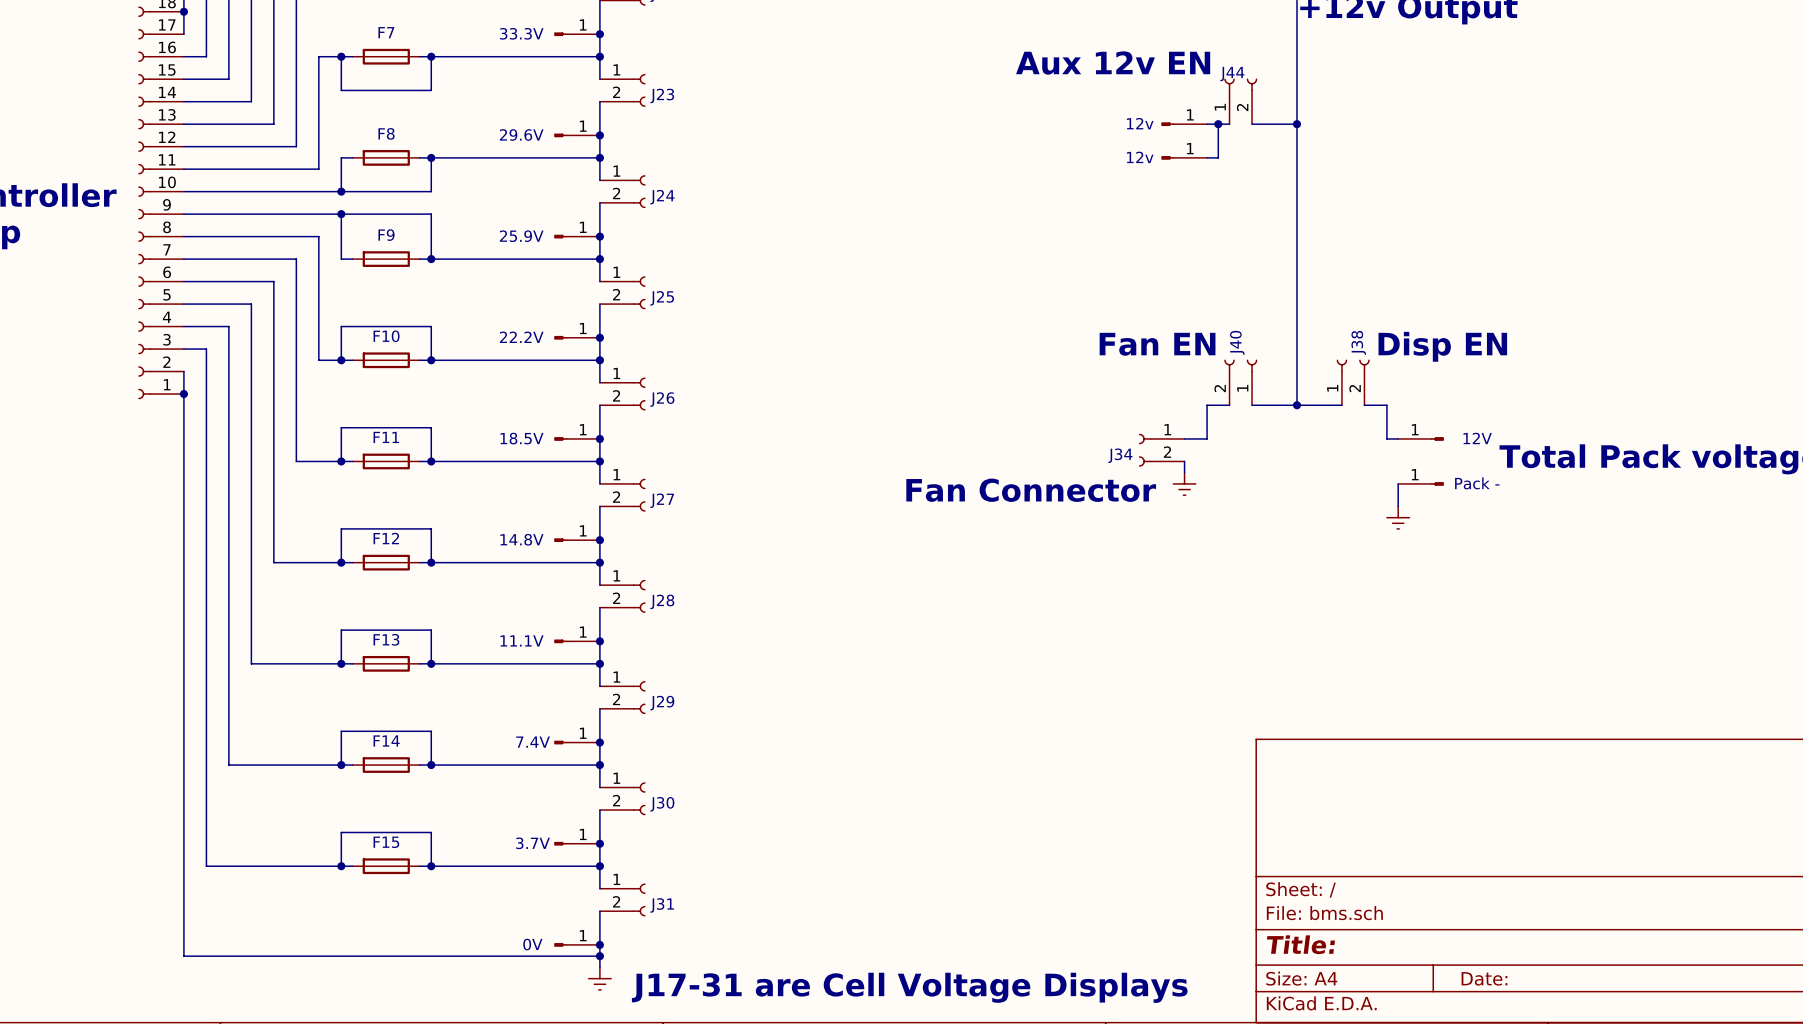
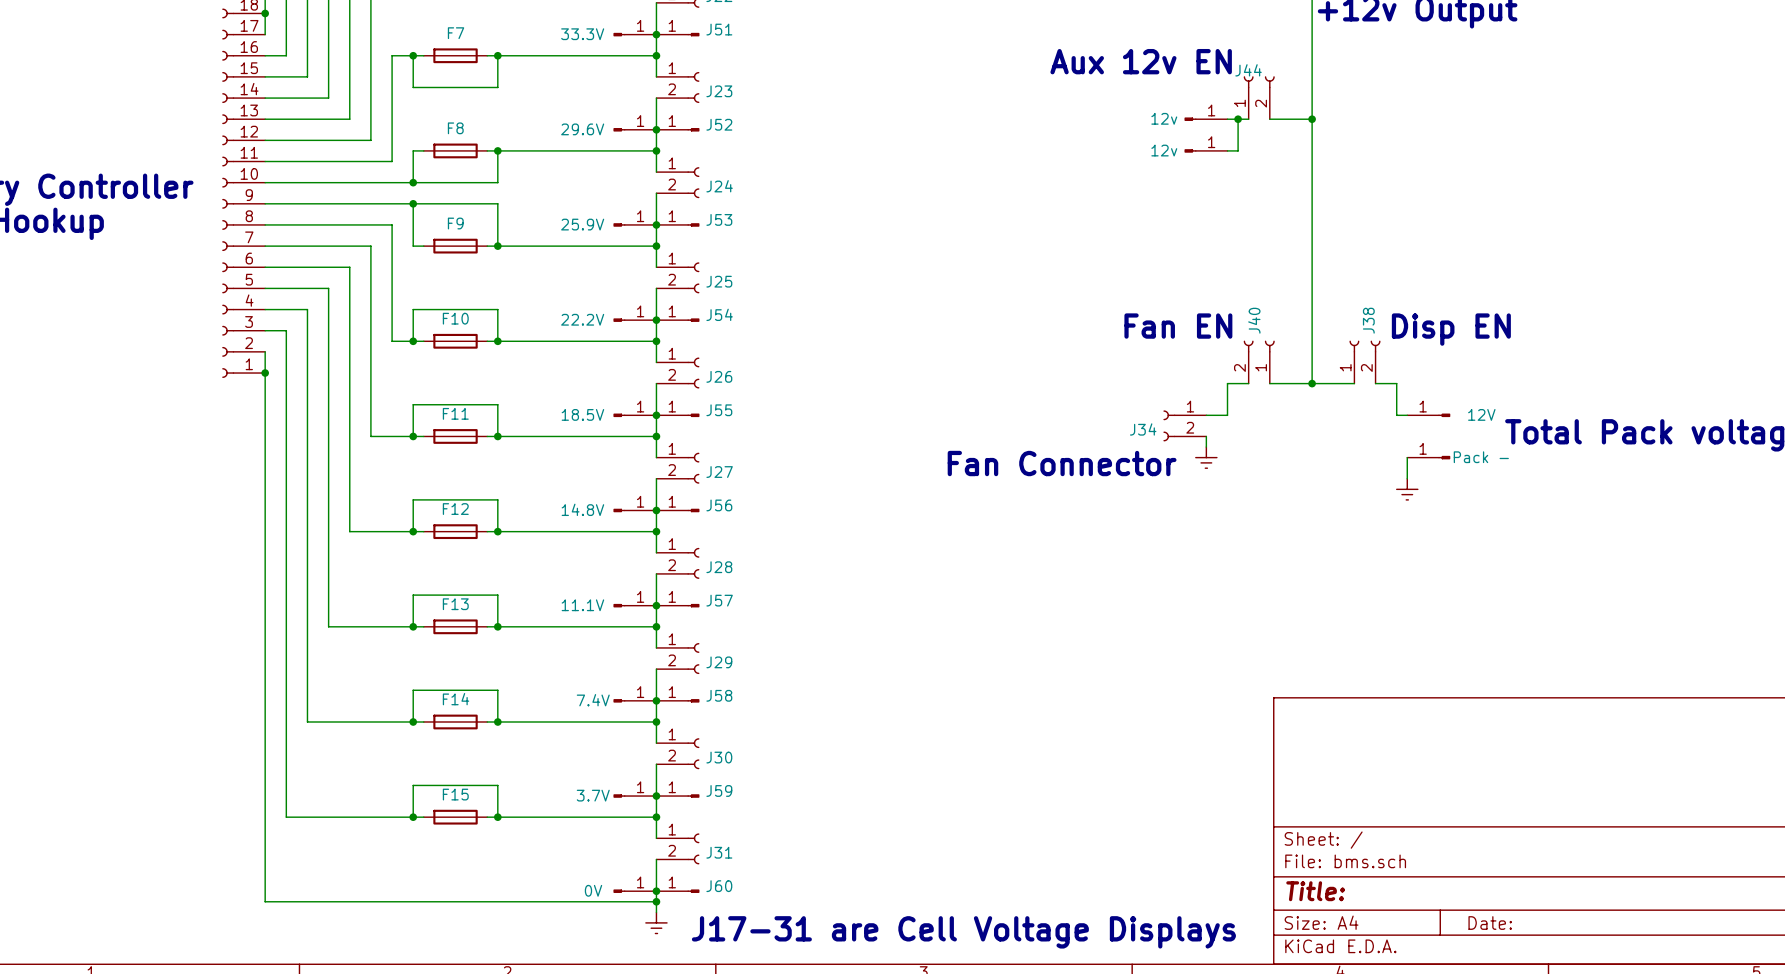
J51: none -> (677, 34)
J52: none -> (677, 129)
J53: none -> (677, 224)
J54: none -> (677, 320)
J55: none -> (677, 415)
J56: none -> (677, 510)
J57: none -> (677, 605)
J58: none -> (677, 700)
J59: none -> (677, 796)
J60: none -> (677, 891)

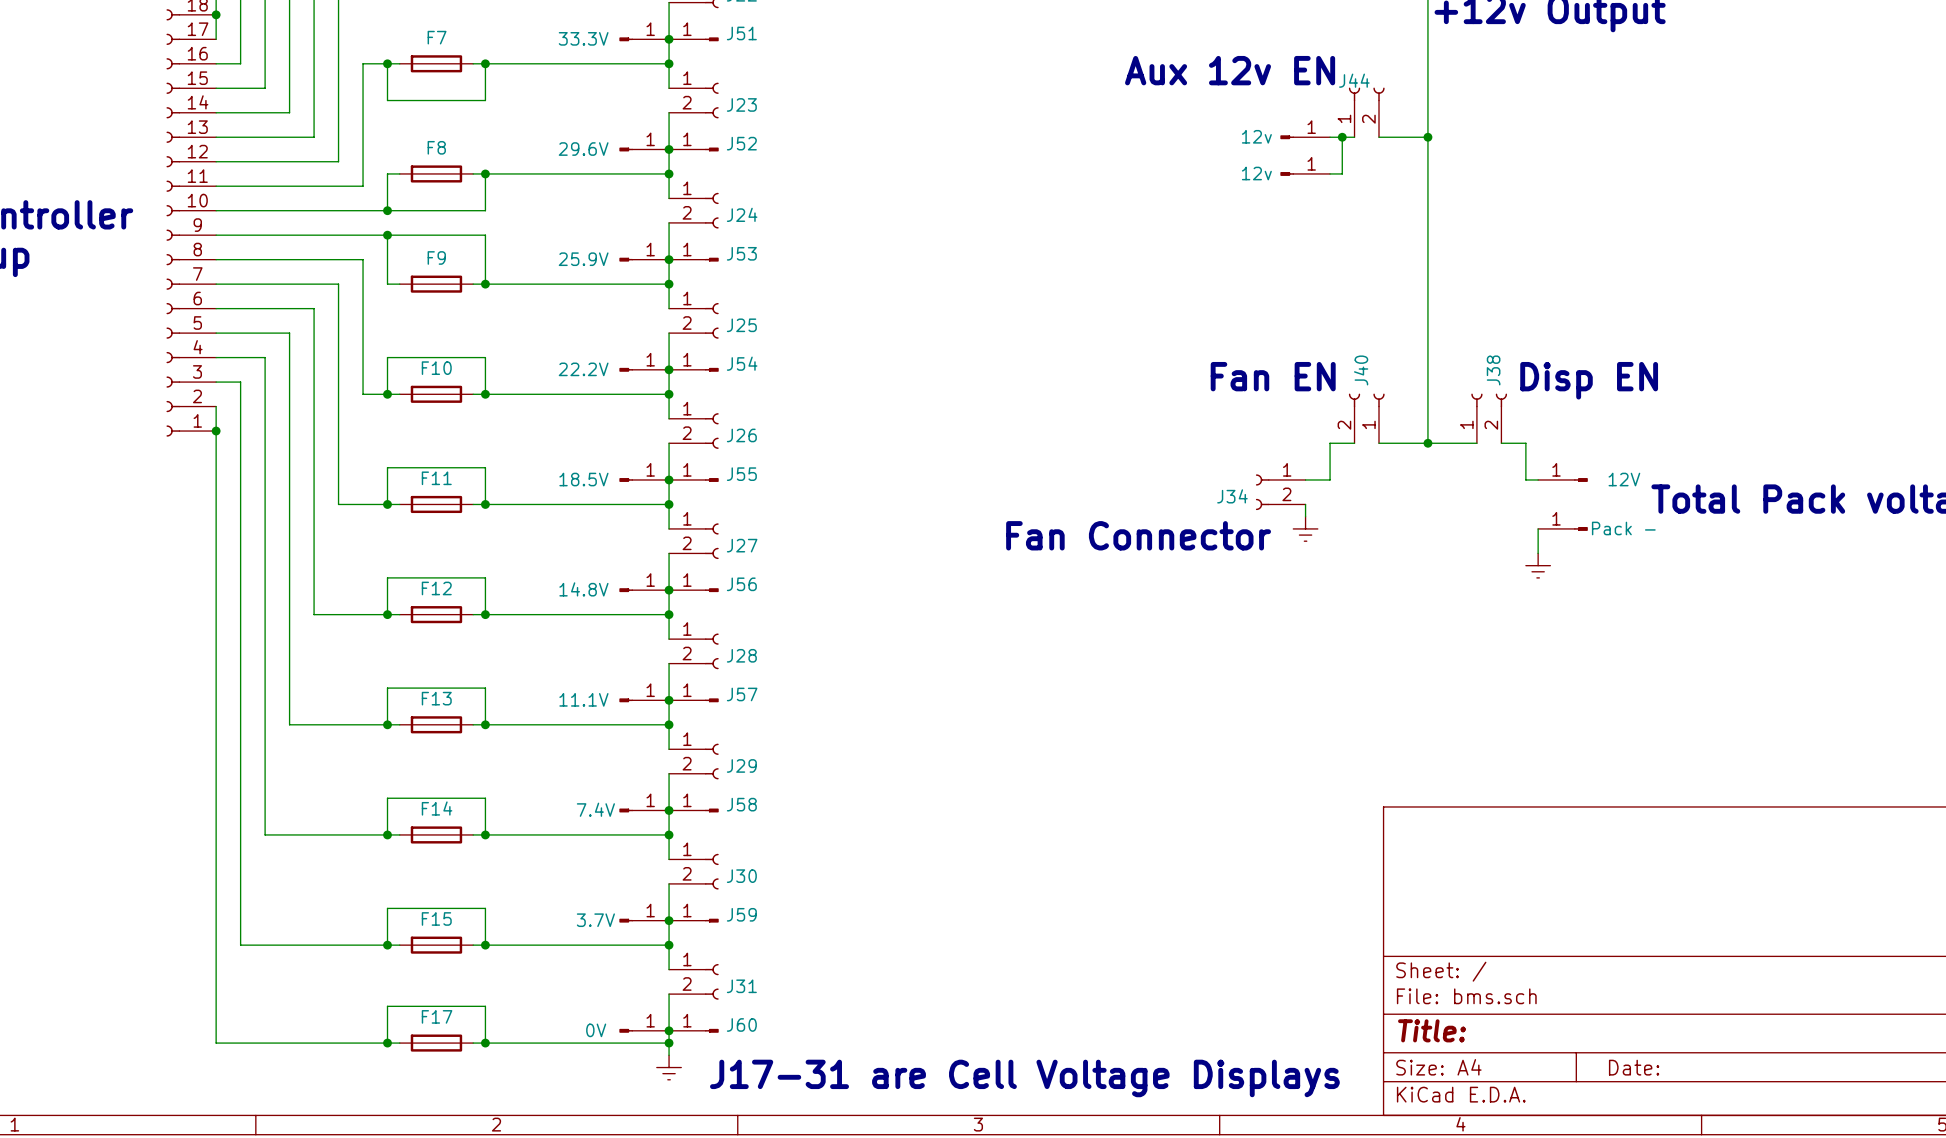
wire: none -> (387, 1043) (387, 1006) (485, 1006) (485, 1043)
junction: none -> (387, 1043)
F17: none -> (436, 1043)
junction: none -> (485, 1043)

